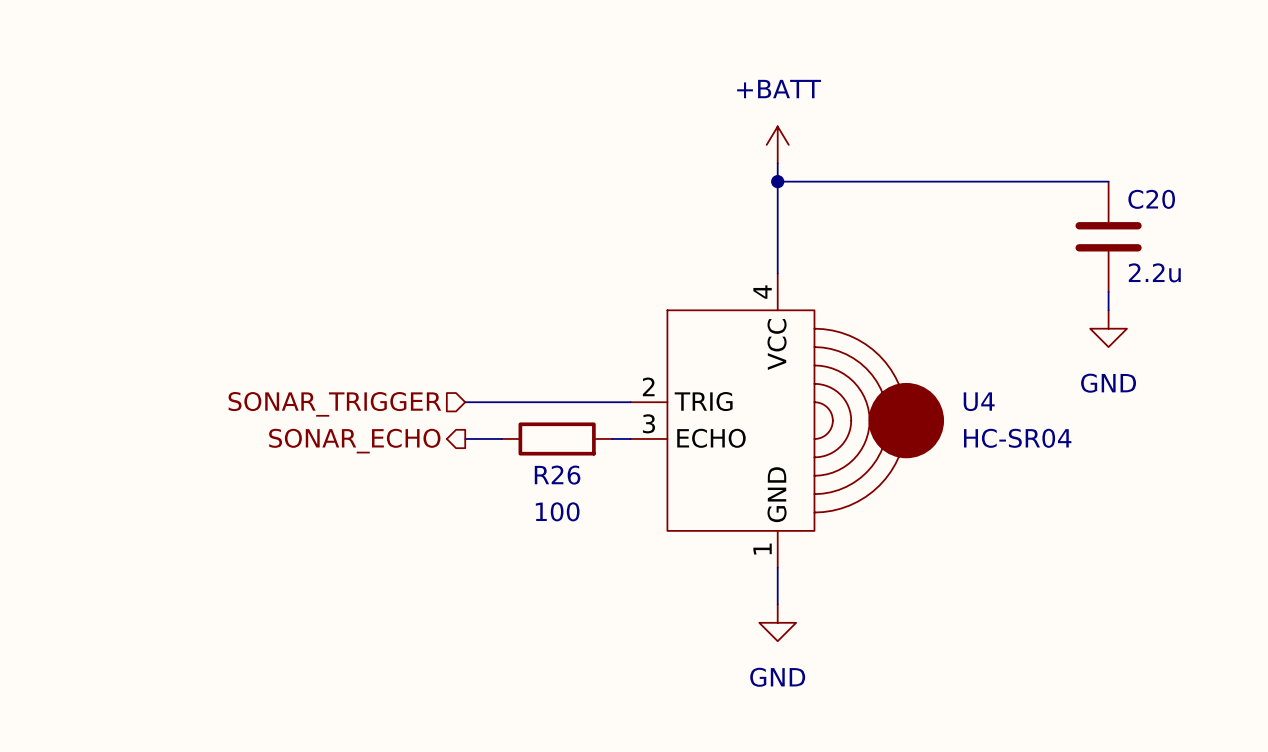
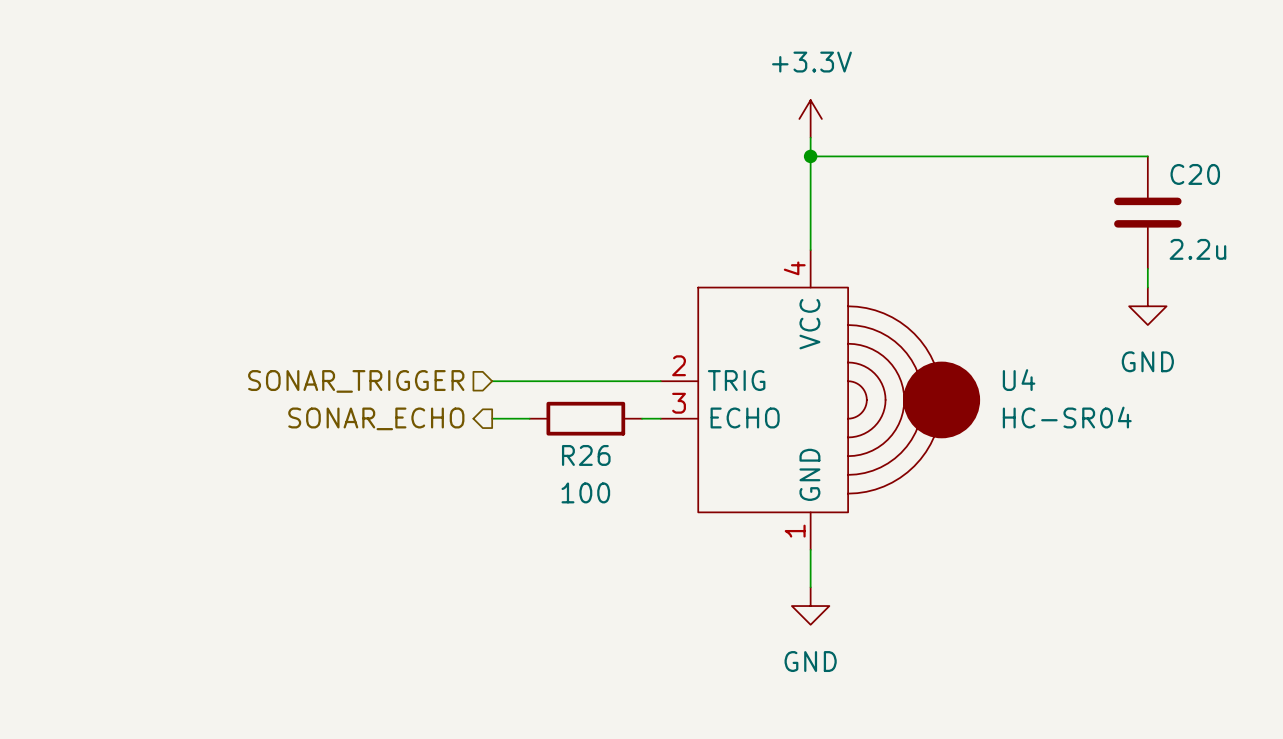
power symbol: +BATT (777, 144) -> +3.3V (810, 118)

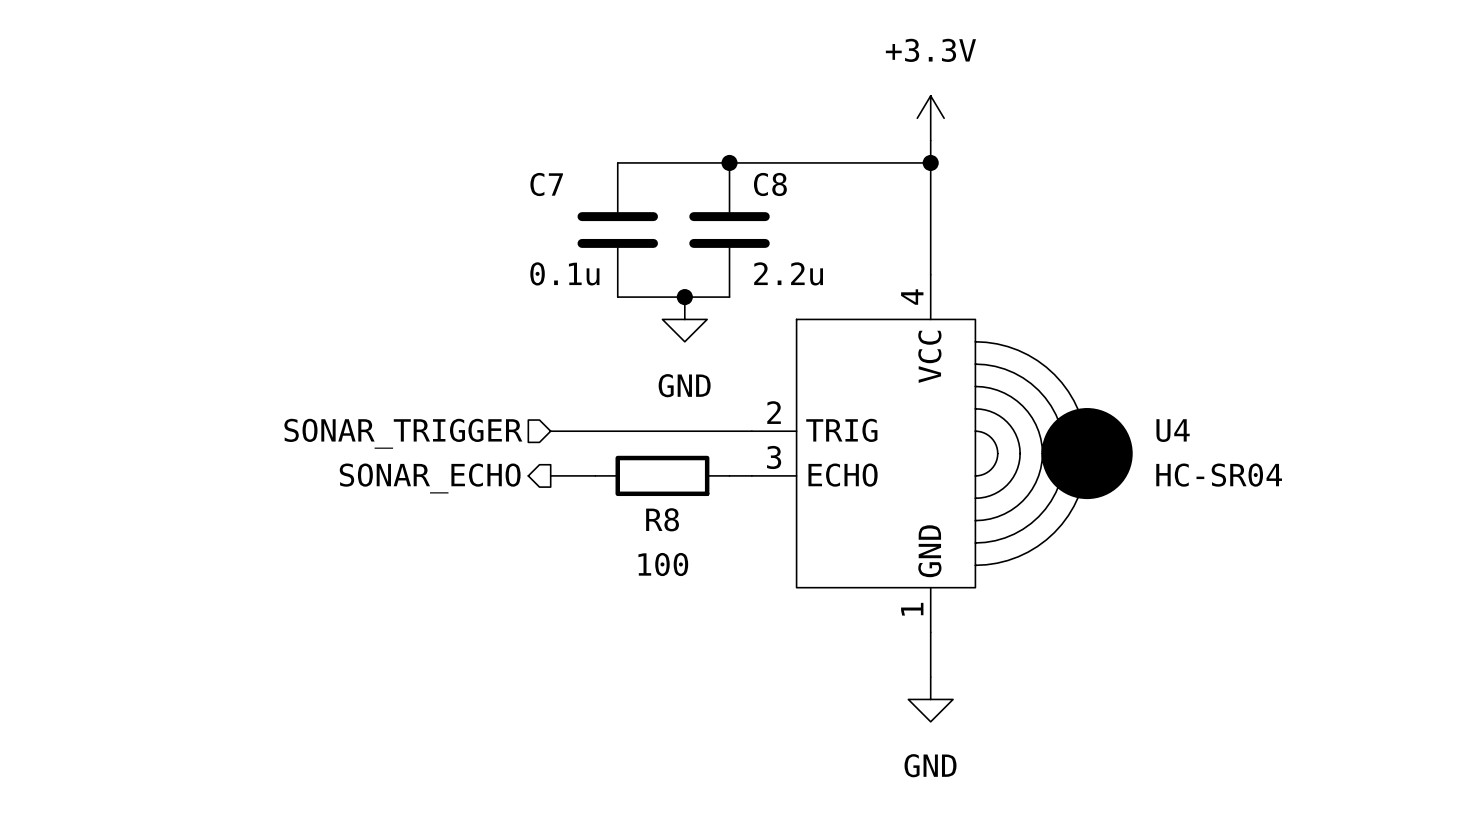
junction: none -> (729, 162)
wire: (810, 156) (1147, 156) -> (930, 162) (617, 162)
C7: none -> 0.1u (617, 230)
C8: none -> 2.2u (729, 230)
C20: 2.2u (1147, 212) -> none
wire: none -> (617, 297) (729, 297)
junction: none -> (684, 297)
wire: (1147, 268) (1147, 287) -> none
power symbol: none -> GND (684, 319)
power symbol: GND (1147, 306) -> none
R26 name: R26 (586, 455) -> R8 (662, 519)

